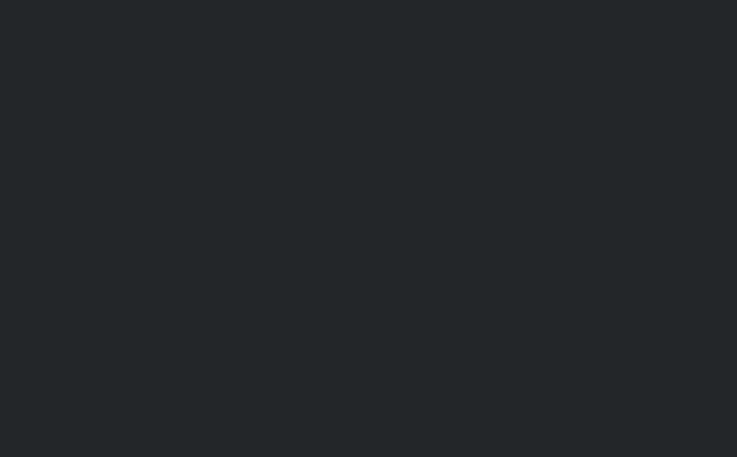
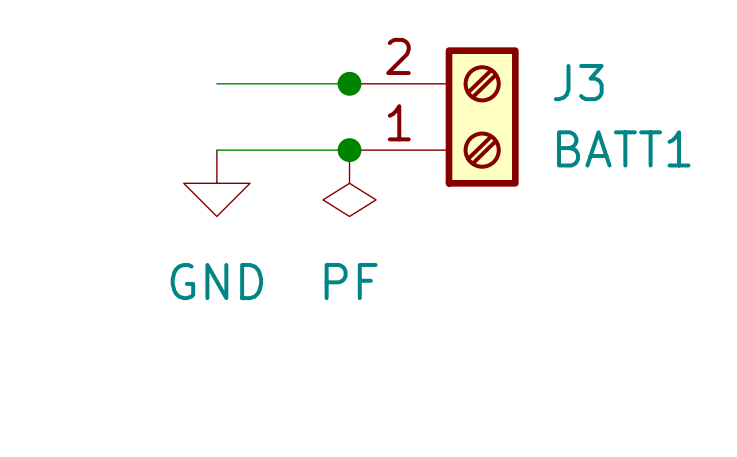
wire: none -> (216, 83) (349, 83)
junction: none -> (349, 83)
BATT1: none -> J3 (434, 116)
wire: none -> (216, 150) (349, 150)
junction: none -> (349, 150)
power symbol: none -> GND (216, 183)
power symbol: none -> PF (349, 183)

